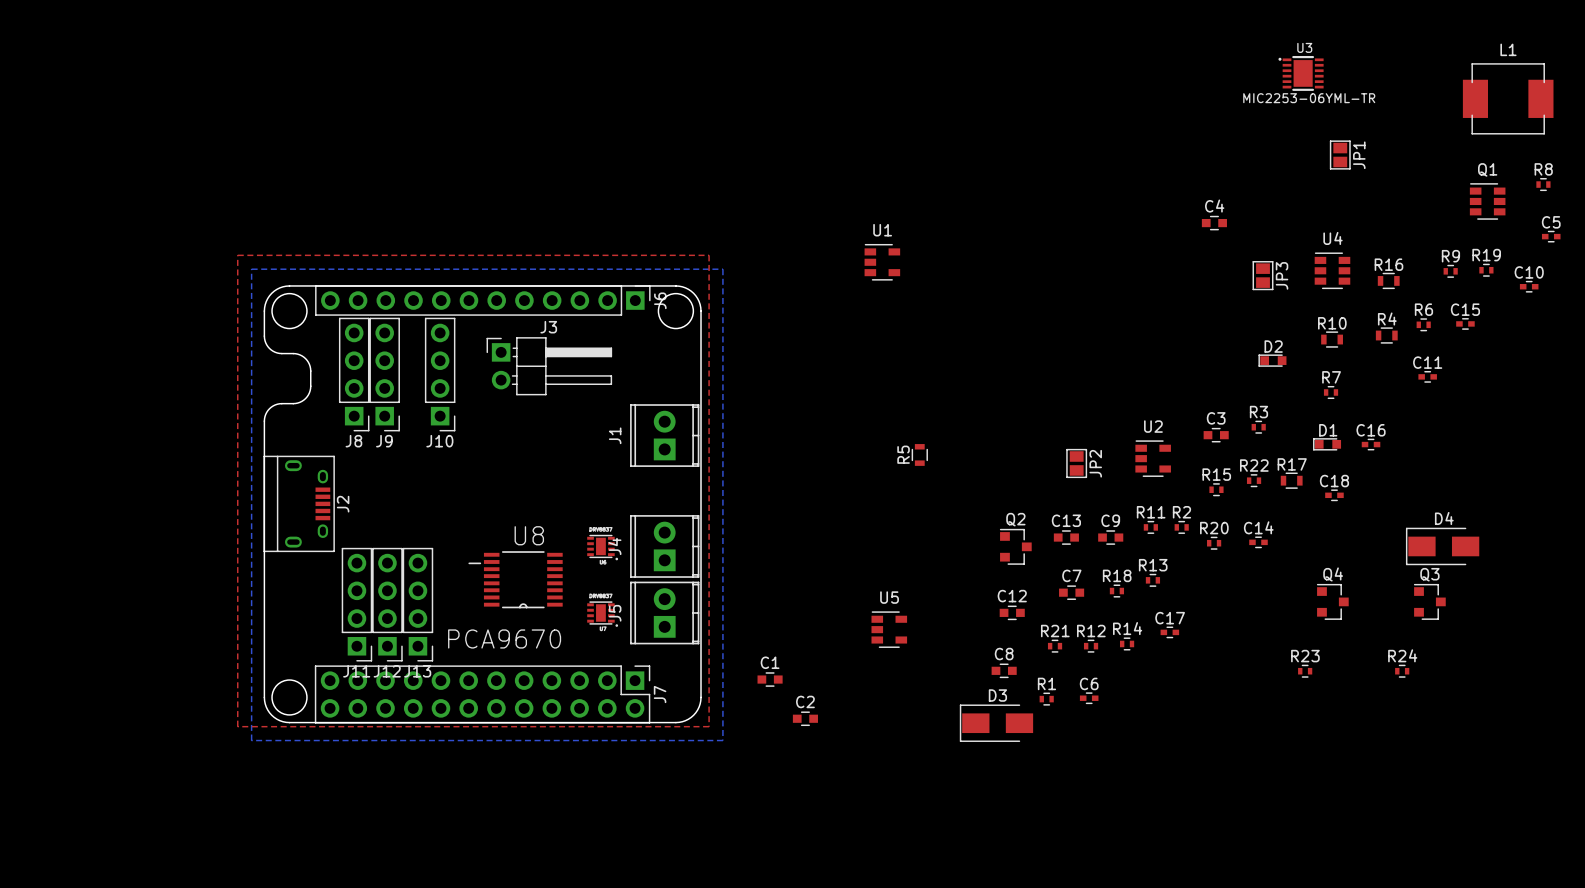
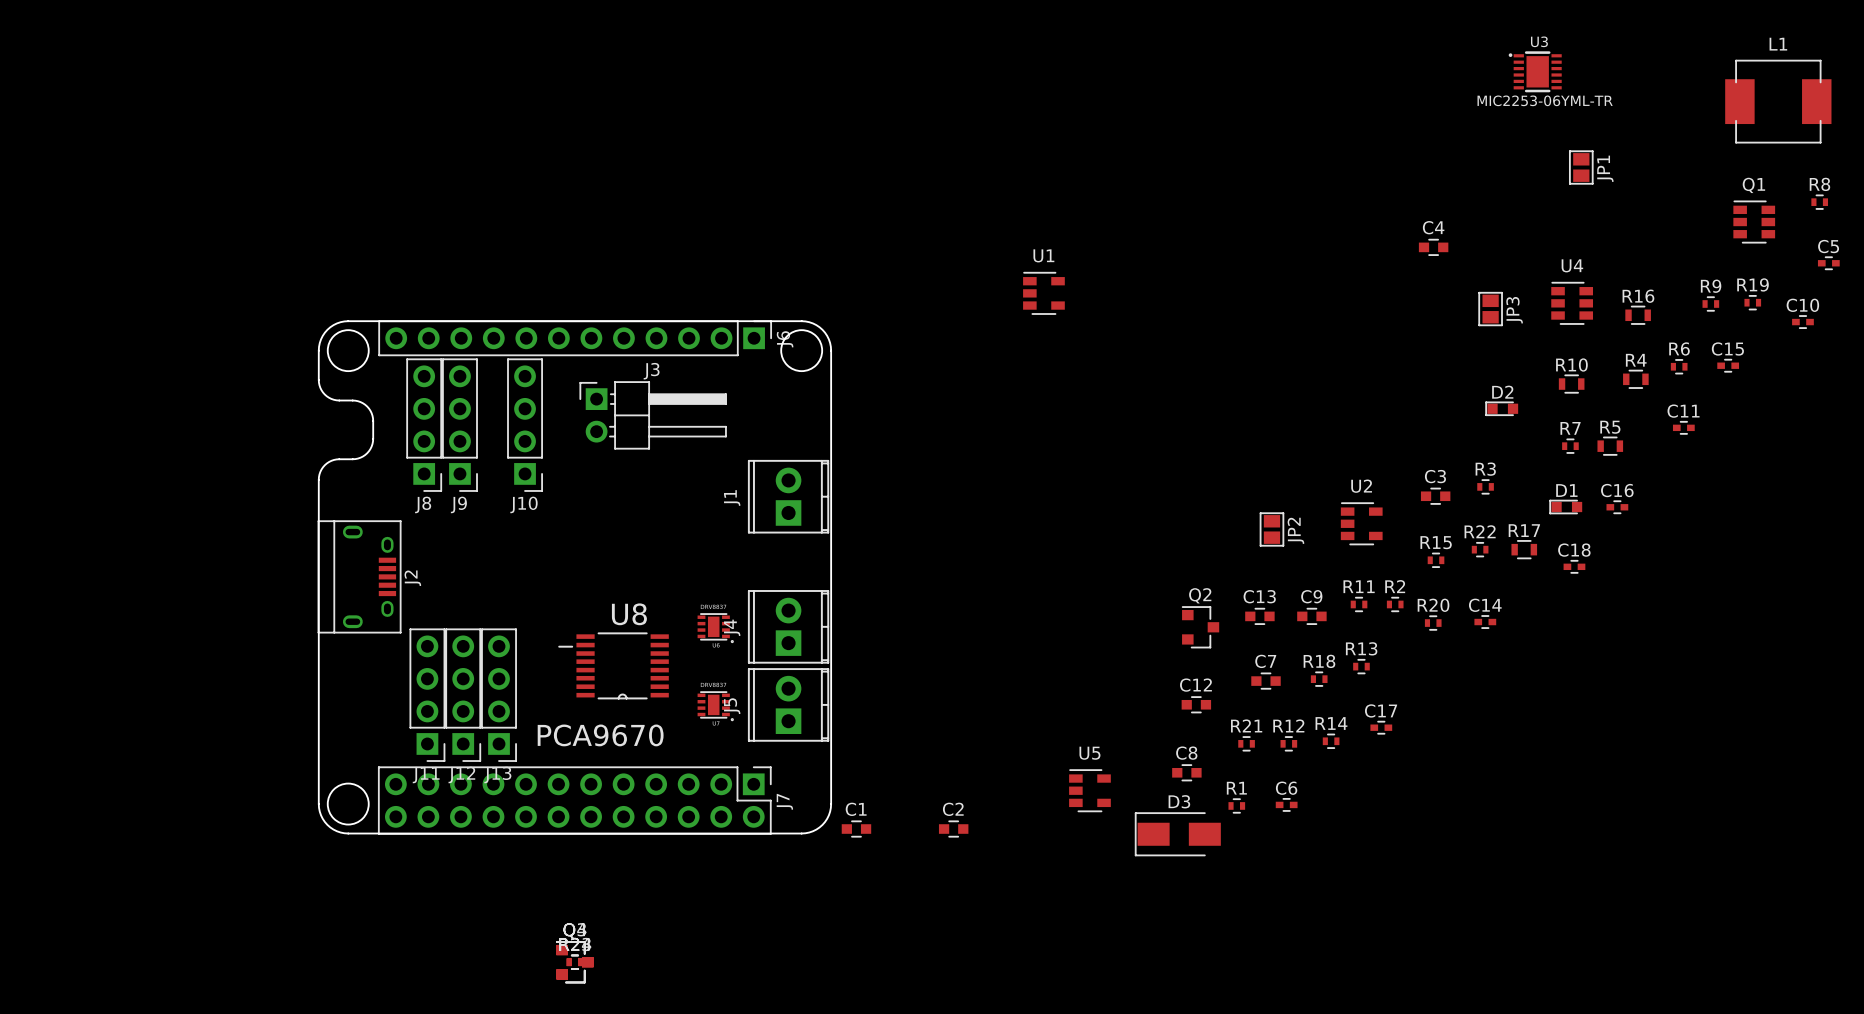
top zone outline: (237, 255) (237, 726) (709, 726) (709, 255) (237, 255) -> none
bottom zone outline: (251, 269) (251, 740) (722, 740) (722, 269) (251, 269) -> none
R5 rotation: 0° (919, 454) -> 90° clockwise (1610, 446)
R5 position: (919, 454) -> (1610, 446)
D4: (1442, 546) -> none
Q4 position: (1332, 601) -> (574, 962)
Q3 position: (1429, 601) -> (574, 962)
U5 position: (889, 629) -> (1089, 790)
R23 position: (1305, 671) -> (574, 962)
R24 position: (1402, 671) -> (574, 962)
C1 position: (770, 679) -> (856, 829)

